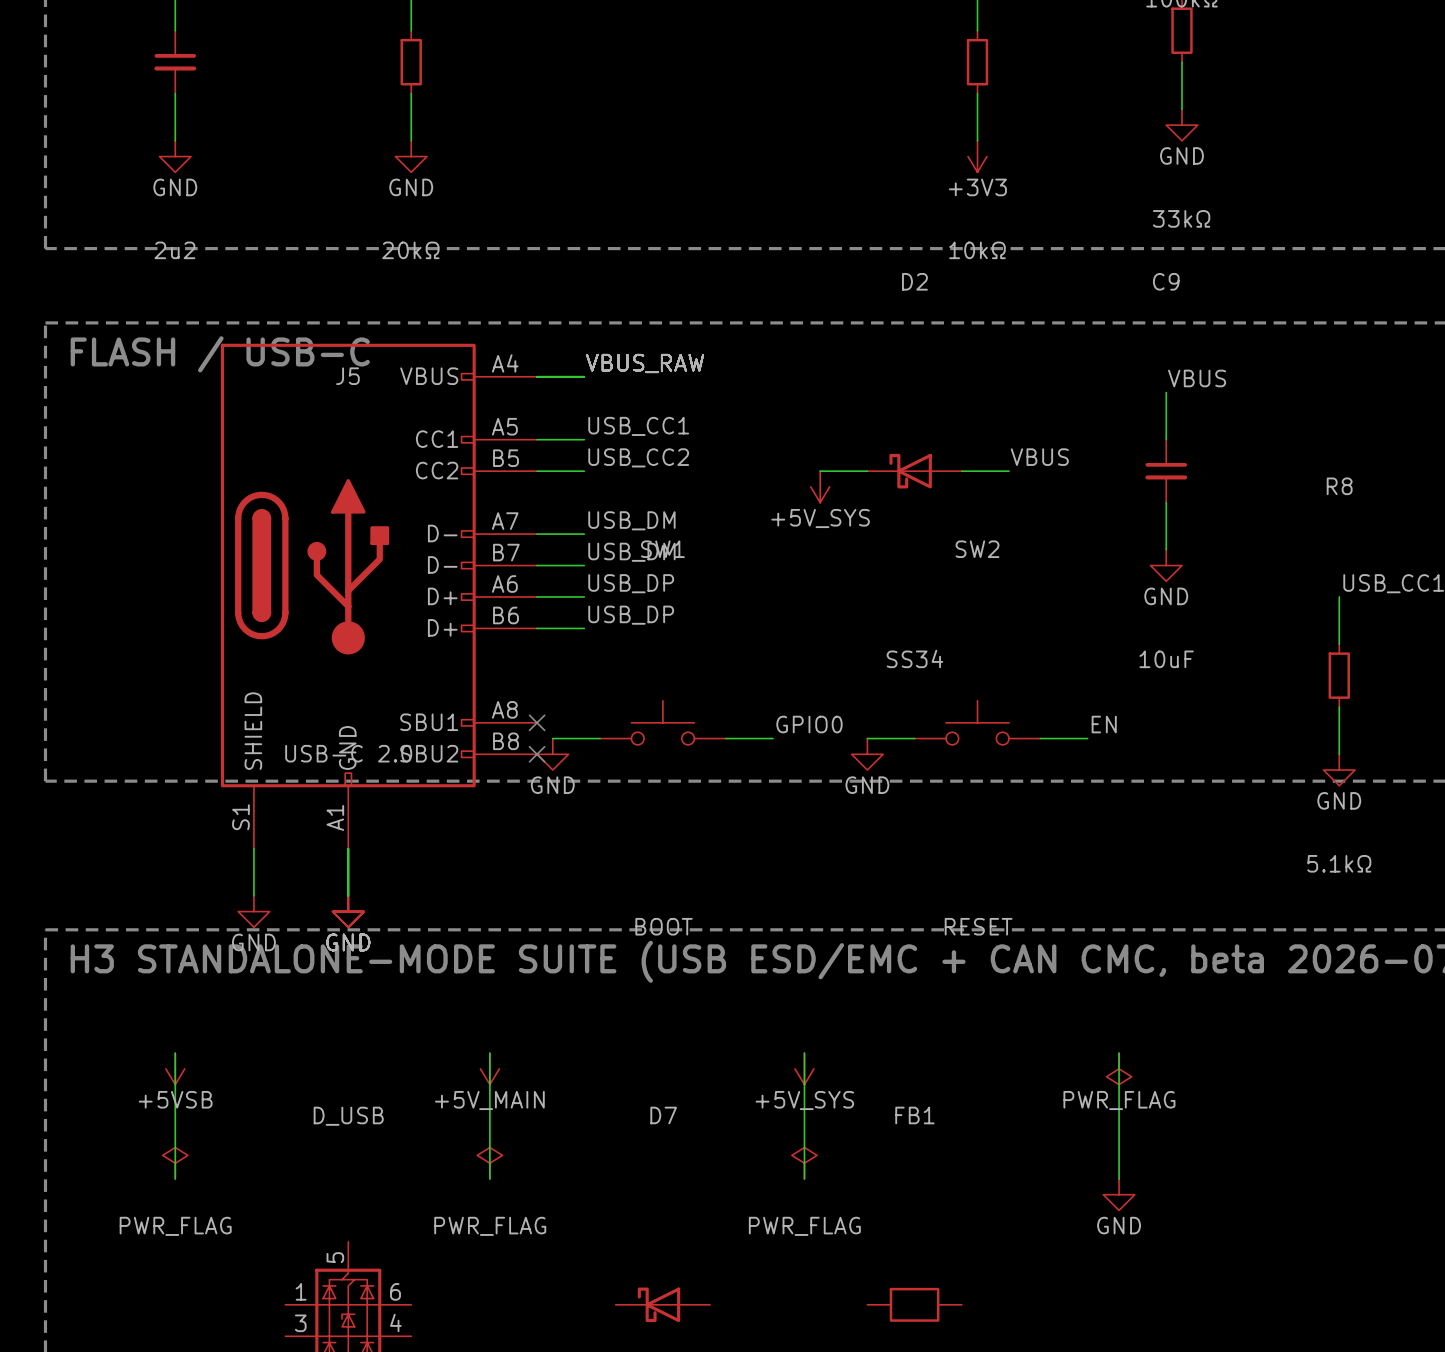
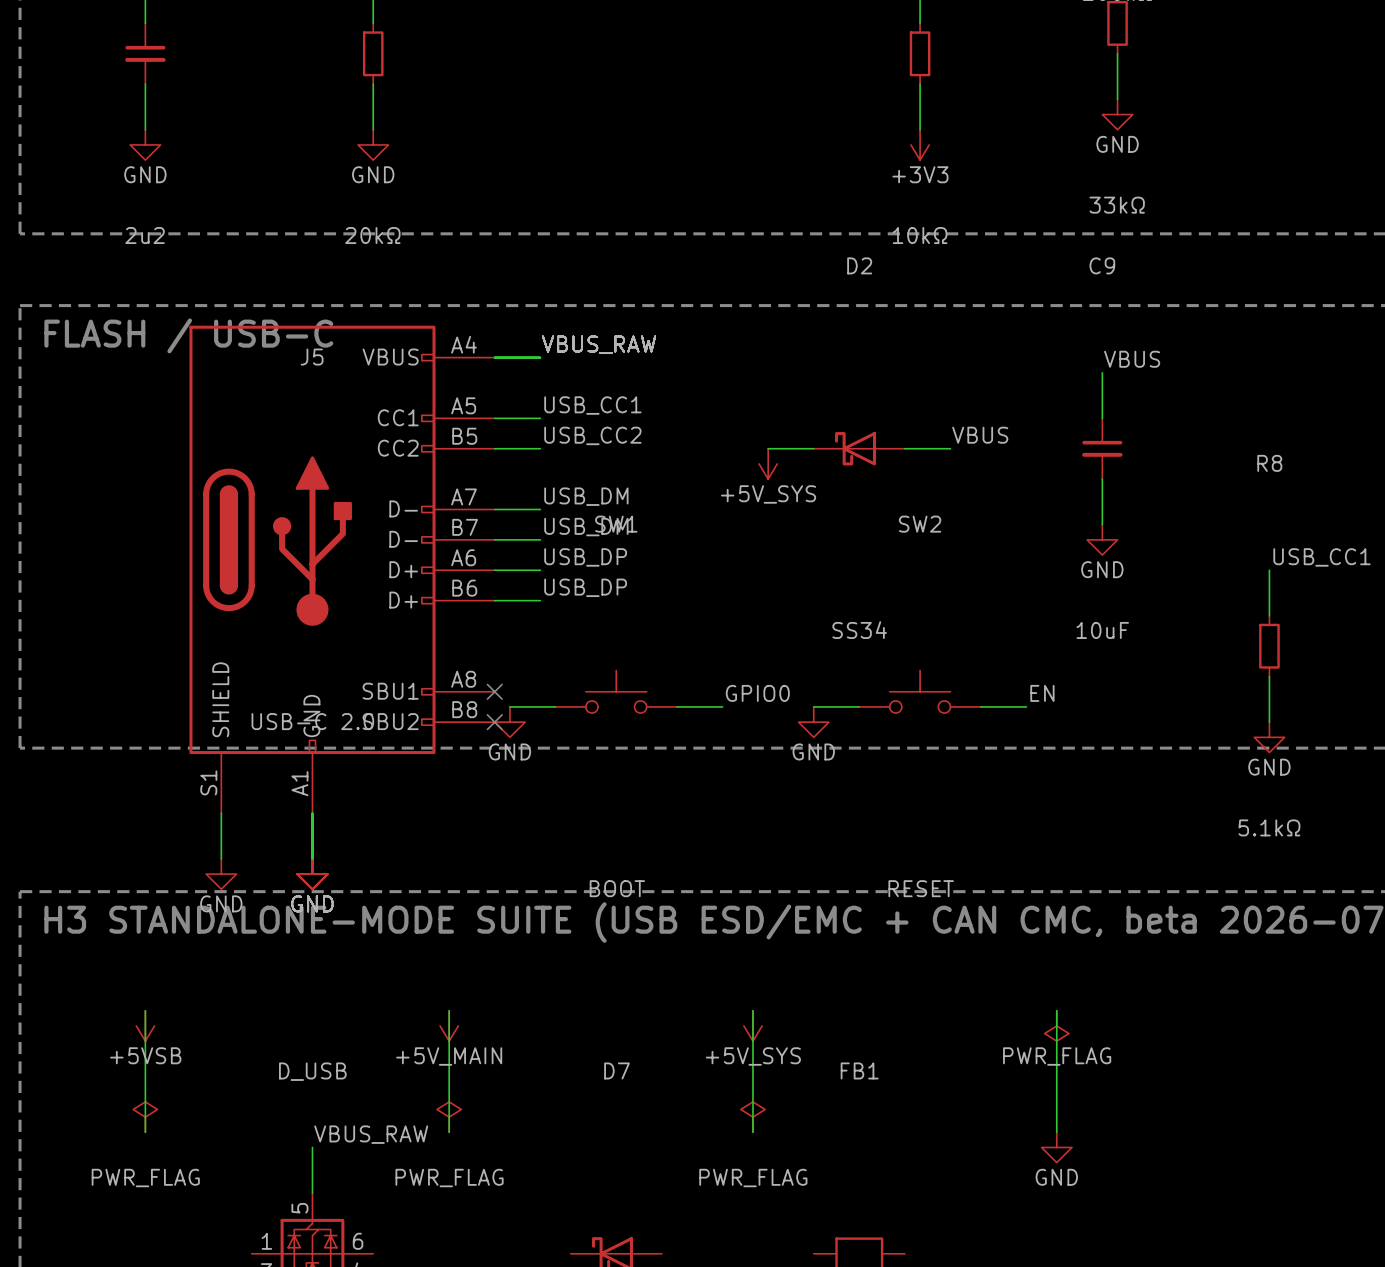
label: none -> VBUS_RAW (371, 1134)
wire: none -> (312, 1147) (312, 1193)

